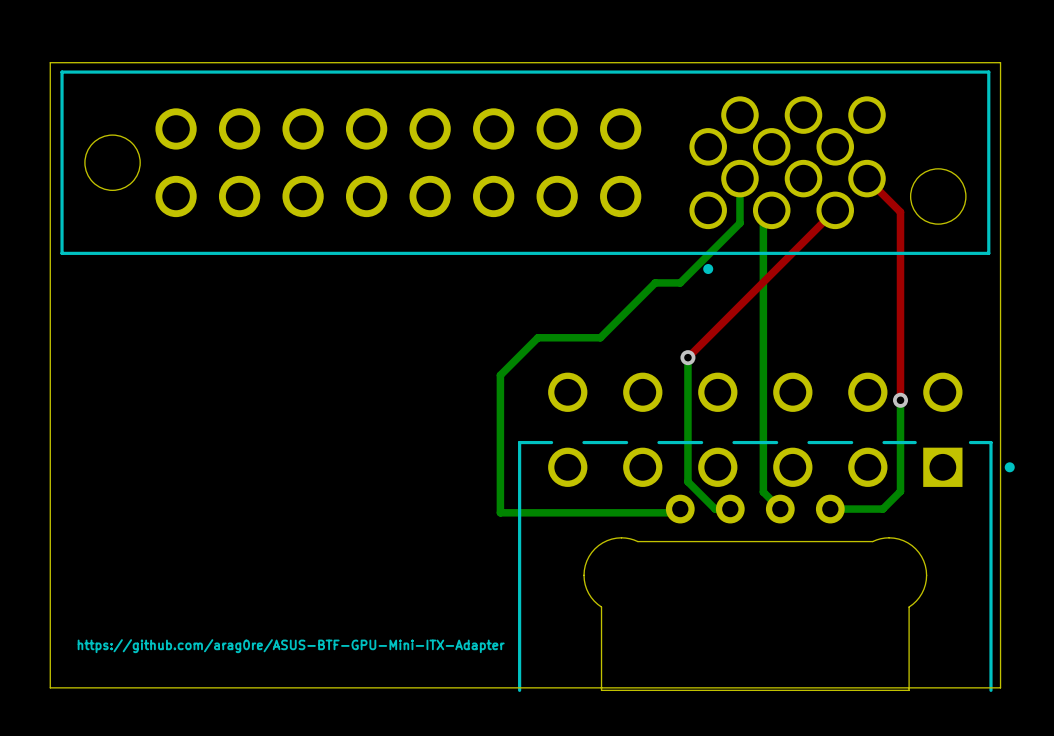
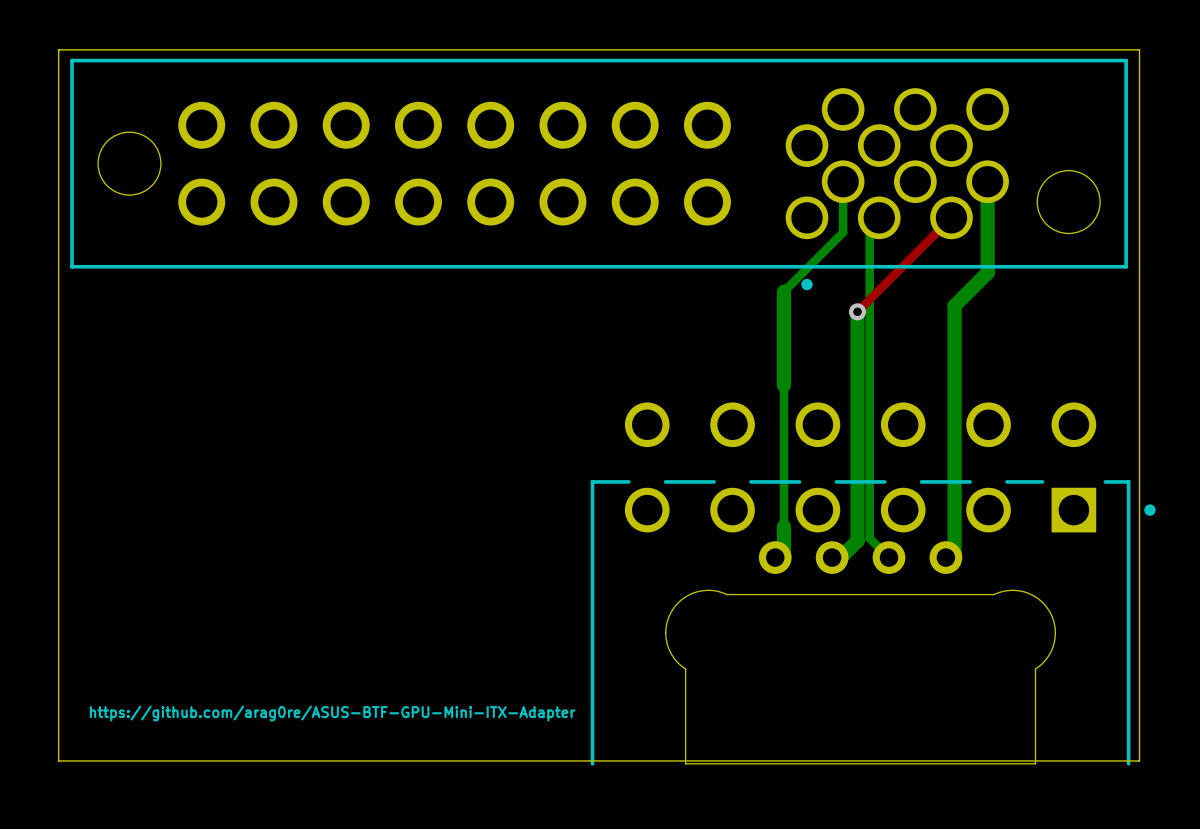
top track: (867, 178) (900, 212) (900, 400) -> none
bottom track: (687, 275) (680, 282) (655, 282) (600, 337) (537, 337) (500, 375) (500, 512) (684, 512) (687, 509) -> (783, 291) (783, 385)
bottom track: none -> (857, 311) (857, 540) (840, 557)
top track: (752, 292) (687, 357) -> none
via: none -> (857, 311)
via: (687, 357) -> none
bottom track: (900, 400) (900, 491) (882, 509) (837, 509) -> (987, 181) (987, 272) (954, 305) (954, 557)
via: (900, 400) -> none
bottom track: (687, 481) (715, 509) (730, 509) -> (783, 526) (783, 557)

